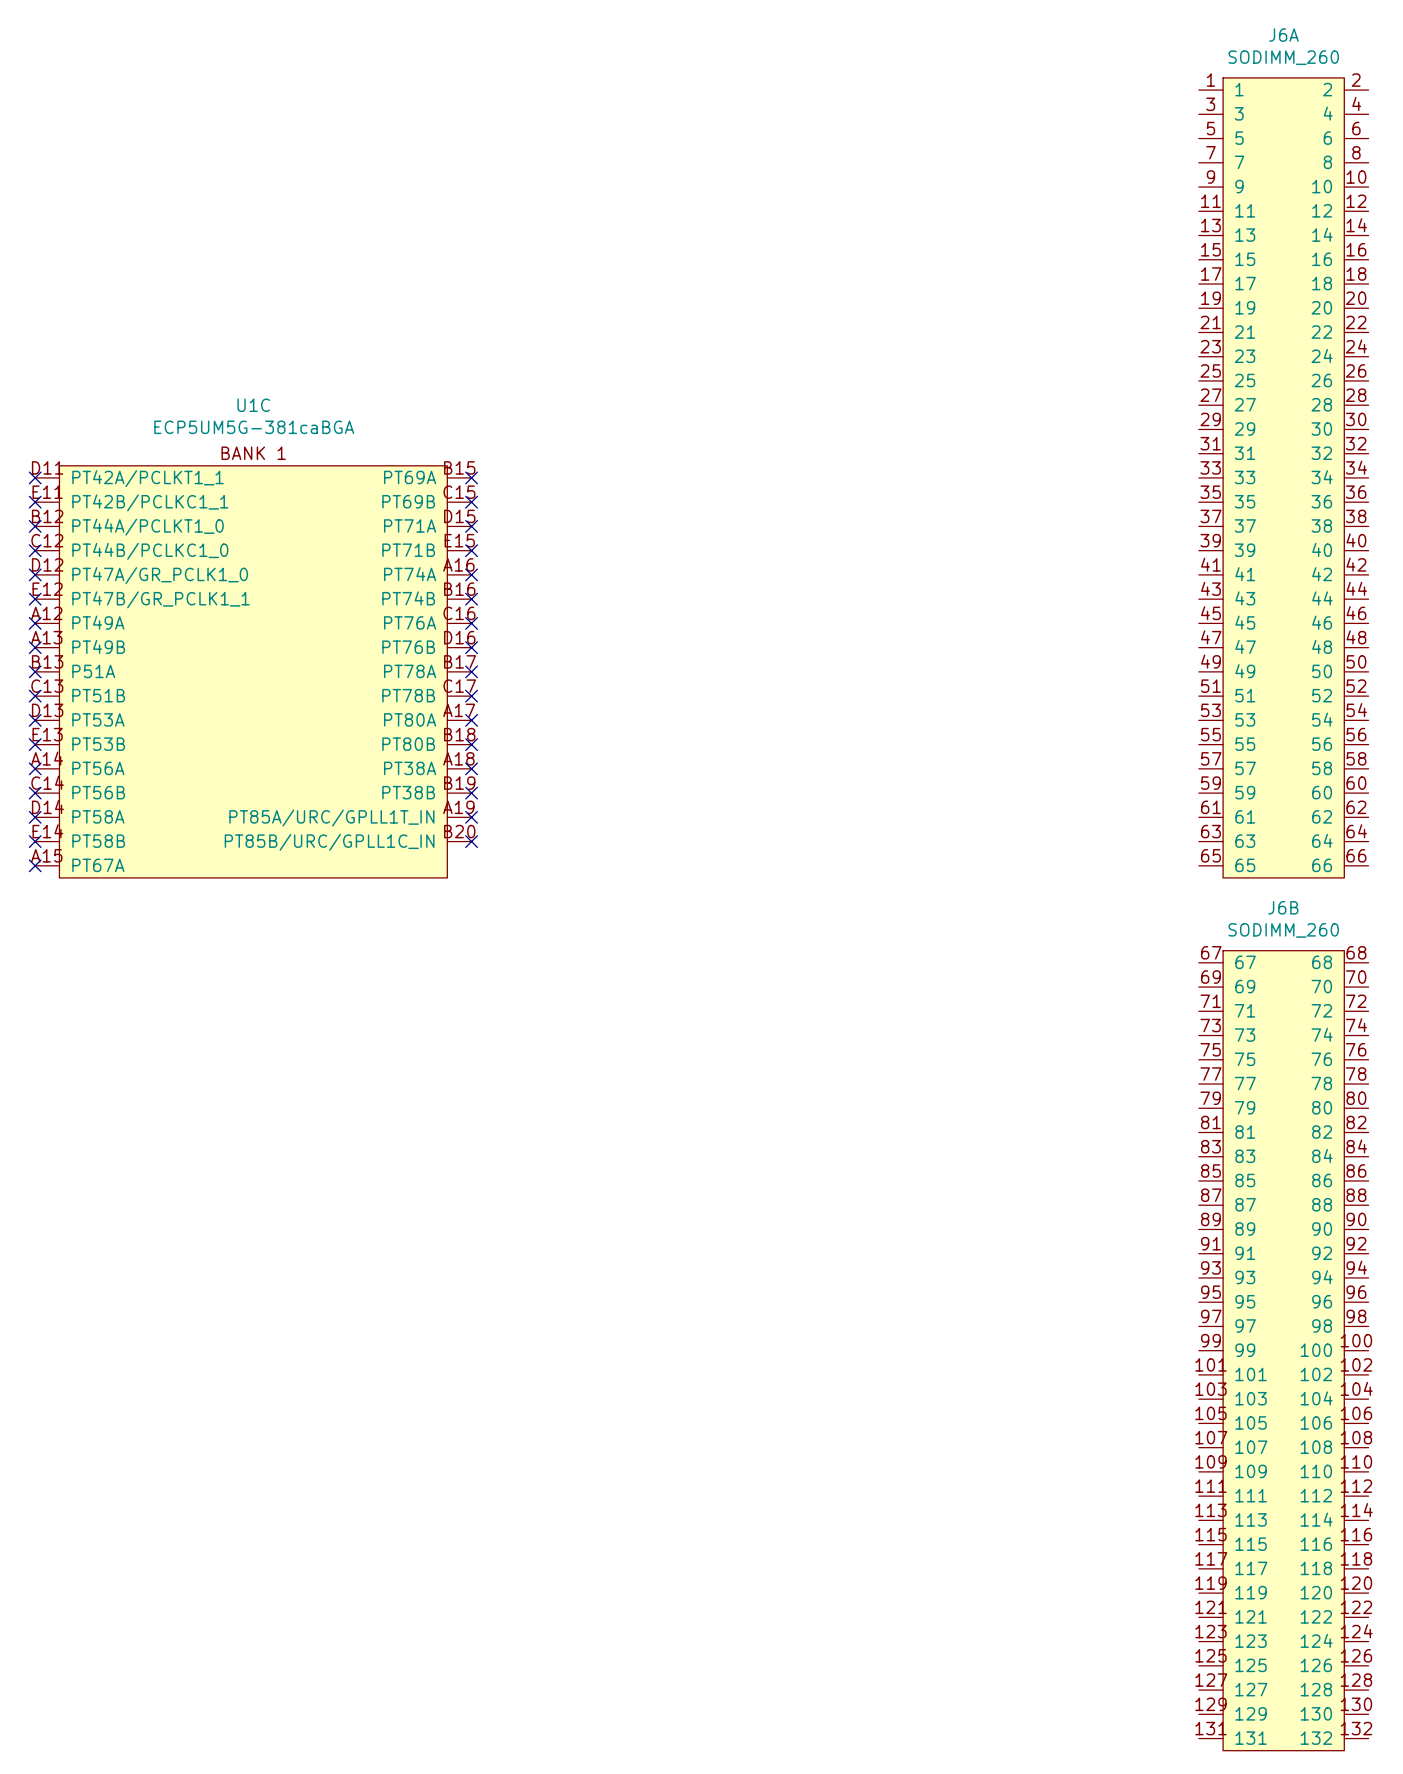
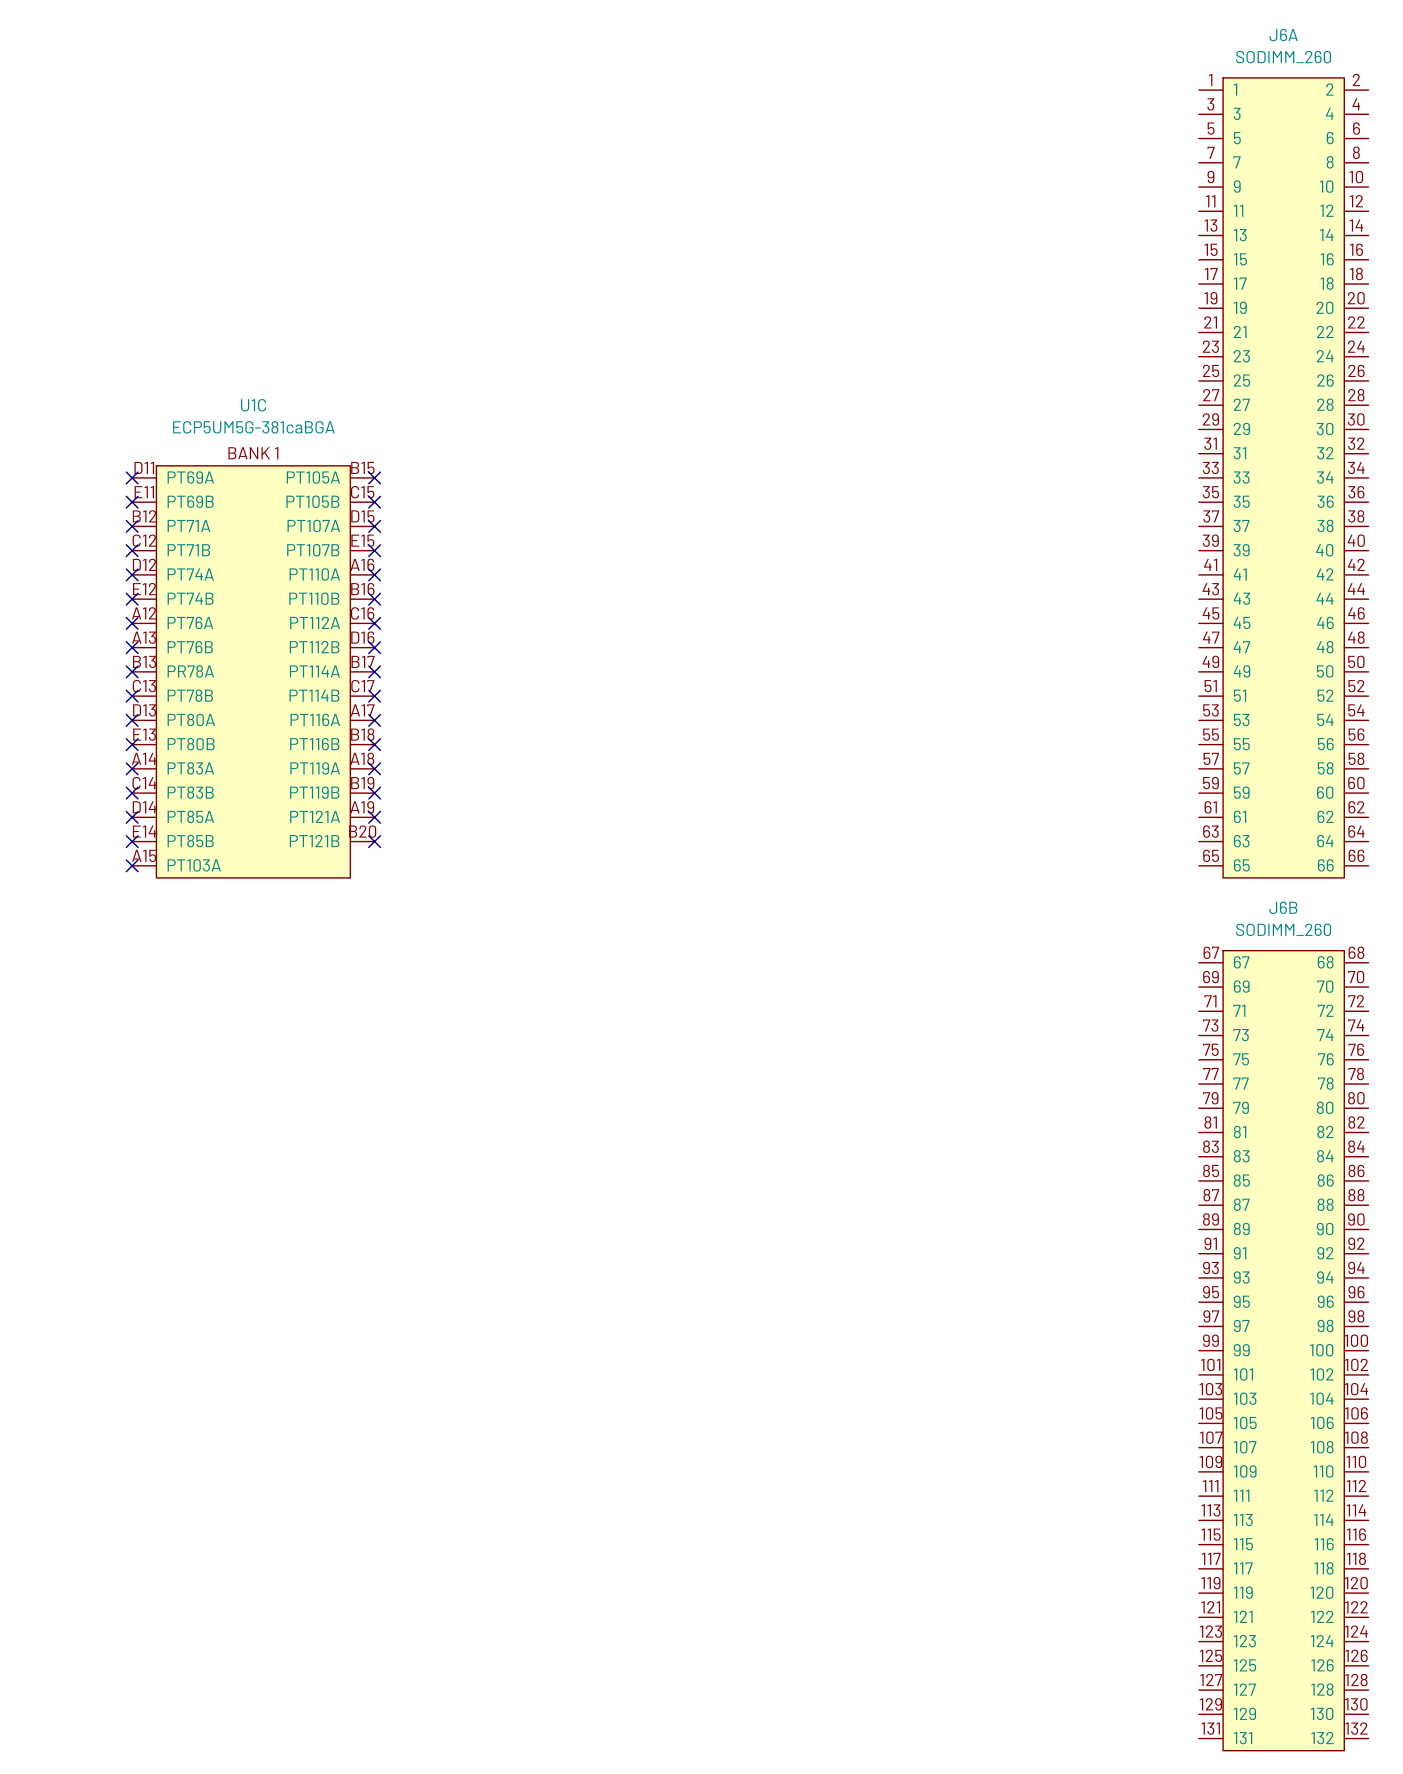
U1C symbol: [35, 465, 472, 878] -> [132, 465, 375, 878]
no-connect mark: (35, 477) -> none
no-connect mark: none -> (132, 477)
no-connect mark: none -> (374, 477)
no-connect mark: (471, 477) -> none
no-connect mark: (35, 502) -> none
no-connect mark: none -> (132, 502)
no-connect mark: none -> (374, 502)
no-connect mark: (471, 502) -> none
no-connect mark: (35, 526) -> none
no-connect mark: none -> (132, 526)
no-connect mark: none -> (374, 526)
no-connect mark: (471, 526) -> none
no-connect mark: (35, 550) -> none
no-connect mark: none -> (132, 550)
no-connect mark: none -> (374, 550)
no-connect mark: (471, 550) -> none
no-connect mark: (35, 574) -> none
no-connect mark: none -> (132, 574)
no-connect mark: none -> (374, 574)
no-connect mark: (471, 574) -> none
no-connect mark: (35, 599) -> none
no-connect mark: none -> (132, 599)
no-connect mark: none -> (374, 599)
no-connect mark: (471, 599) -> none
no-connect mark: (35, 623) -> none
no-connect mark: none -> (132, 623)
no-connect mark: none -> (374, 623)
no-connect mark: (471, 623) -> none
no-connect mark: (35, 647) -> none
no-connect mark: none -> (132, 647)
no-connect mark: none -> (374, 647)
no-connect mark: (471, 647) -> none
no-connect mark: (35, 671) -> none
no-connect mark: none -> (132, 671)
no-connect mark: none -> (374, 671)
no-connect mark: (471, 671) -> none
no-connect mark: (35, 696) -> none
no-connect mark: none -> (132, 696)
no-connect mark: none -> (374, 696)
no-connect mark: (471, 696) -> none
no-connect mark: (35, 720) -> none
no-connect mark: none -> (132, 720)
no-connect mark: none -> (374, 720)
no-connect mark: (471, 720) -> none
no-connect mark: (35, 744) -> none
no-connect mark: none -> (132, 744)
no-connect mark: none -> (374, 744)
no-connect mark: (471, 744) -> none
no-connect mark: (35, 768) -> none
no-connect mark: none -> (132, 768)
no-connect mark: none -> (374, 768)
no-connect mark: (471, 768) -> none
no-connect mark: (35, 793) -> none
no-connect mark: none -> (132, 793)
no-connect mark: none -> (374, 793)
no-connect mark: (471, 793) -> none
no-connect mark: (35, 817) -> none
no-connect mark: none -> (132, 817)
no-connect mark: none -> (374, 817)
no-connect mark: (471, 817) -> none
no-connect mark: (35, 841) -> none
no-connect mark: none -> (132, 841)
no-connect mark: none -> (374, 841)
no-connect mark: (471, 841) -> none
no-connect mark: (35, 865) -> none
no-connect mark: none -> (132, 865)

